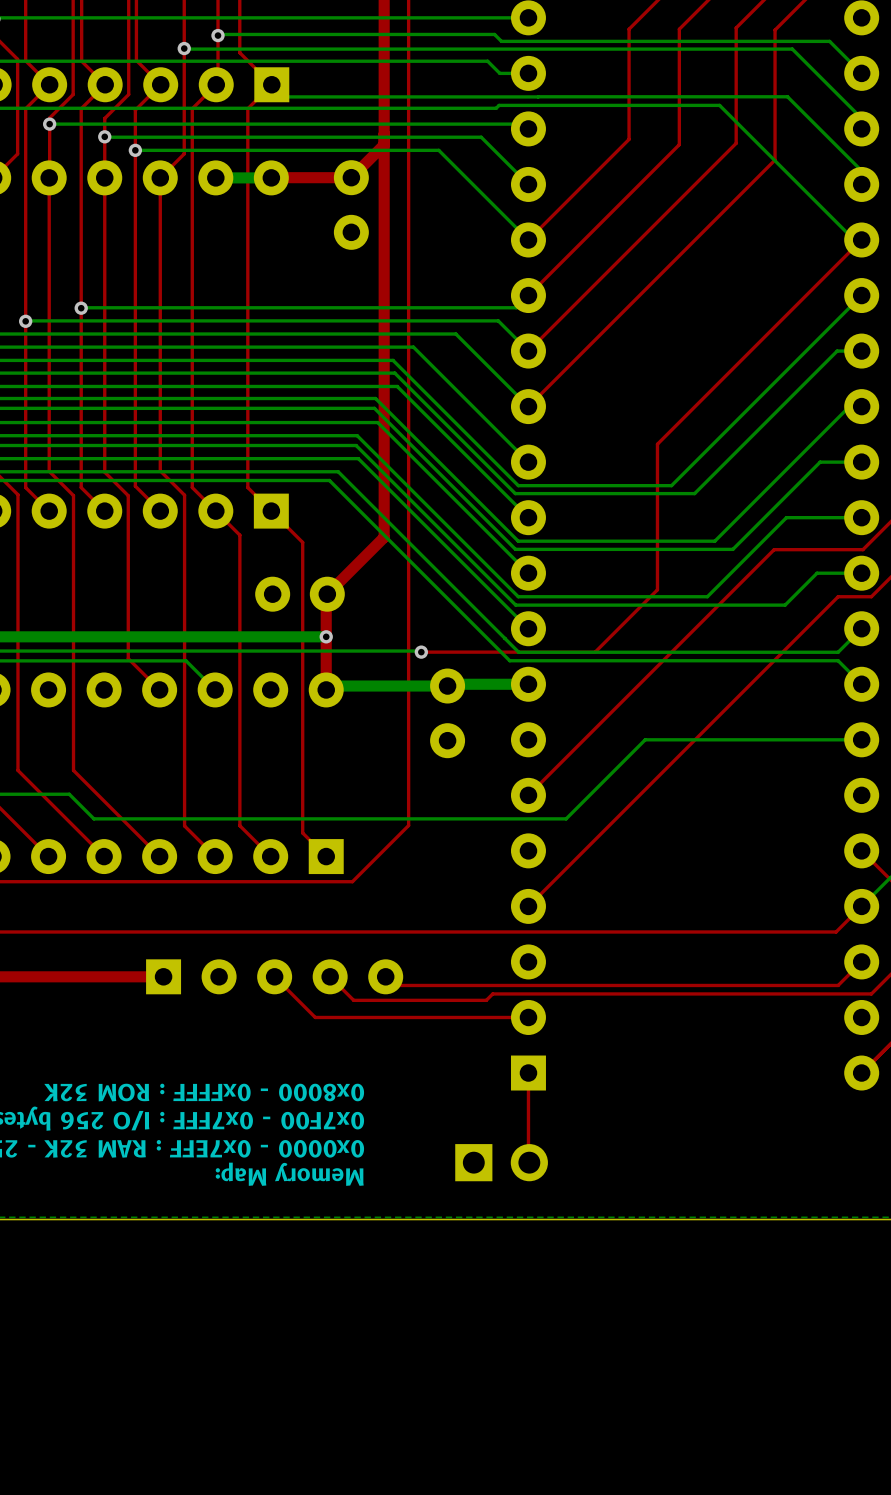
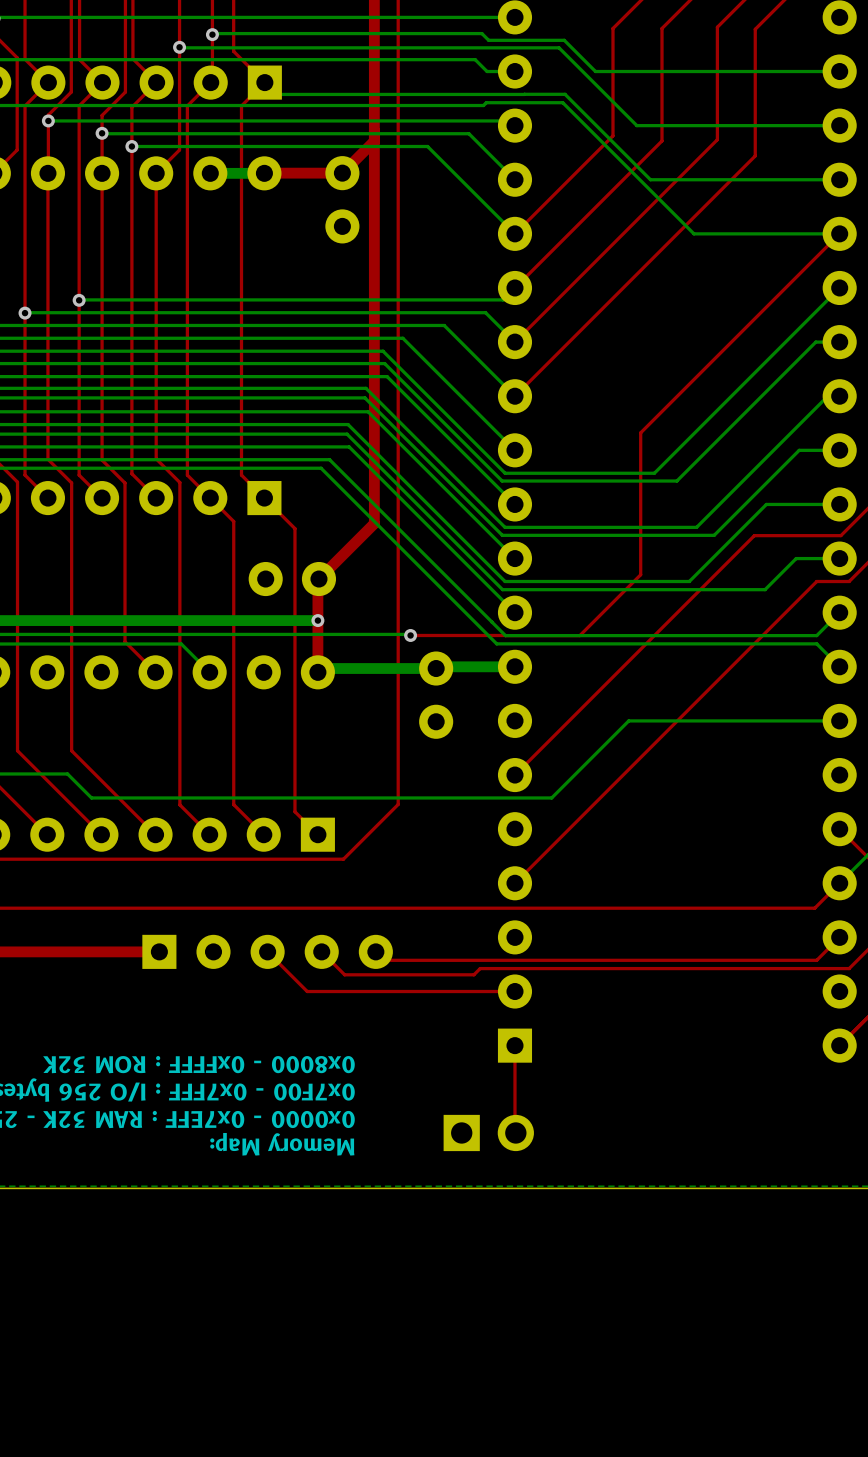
bottom track: (579, 41) (829, 41) (861, 73) -> (564, 40) (595, 71) (839, 71)
bottom track: (573, 49) (792, 49) (861, 118) (861, 128) -> (559, 47) (636, 125) (839, 125)
bottom track: (579, 96) (787, 96) (861, 170) (861, 184) -> (565, 94) (650, 179) (839, 179)
bottom track: (577, 105) (719, 105) (854, 239) -> (562, 102) (693, 233) (832, 233)

